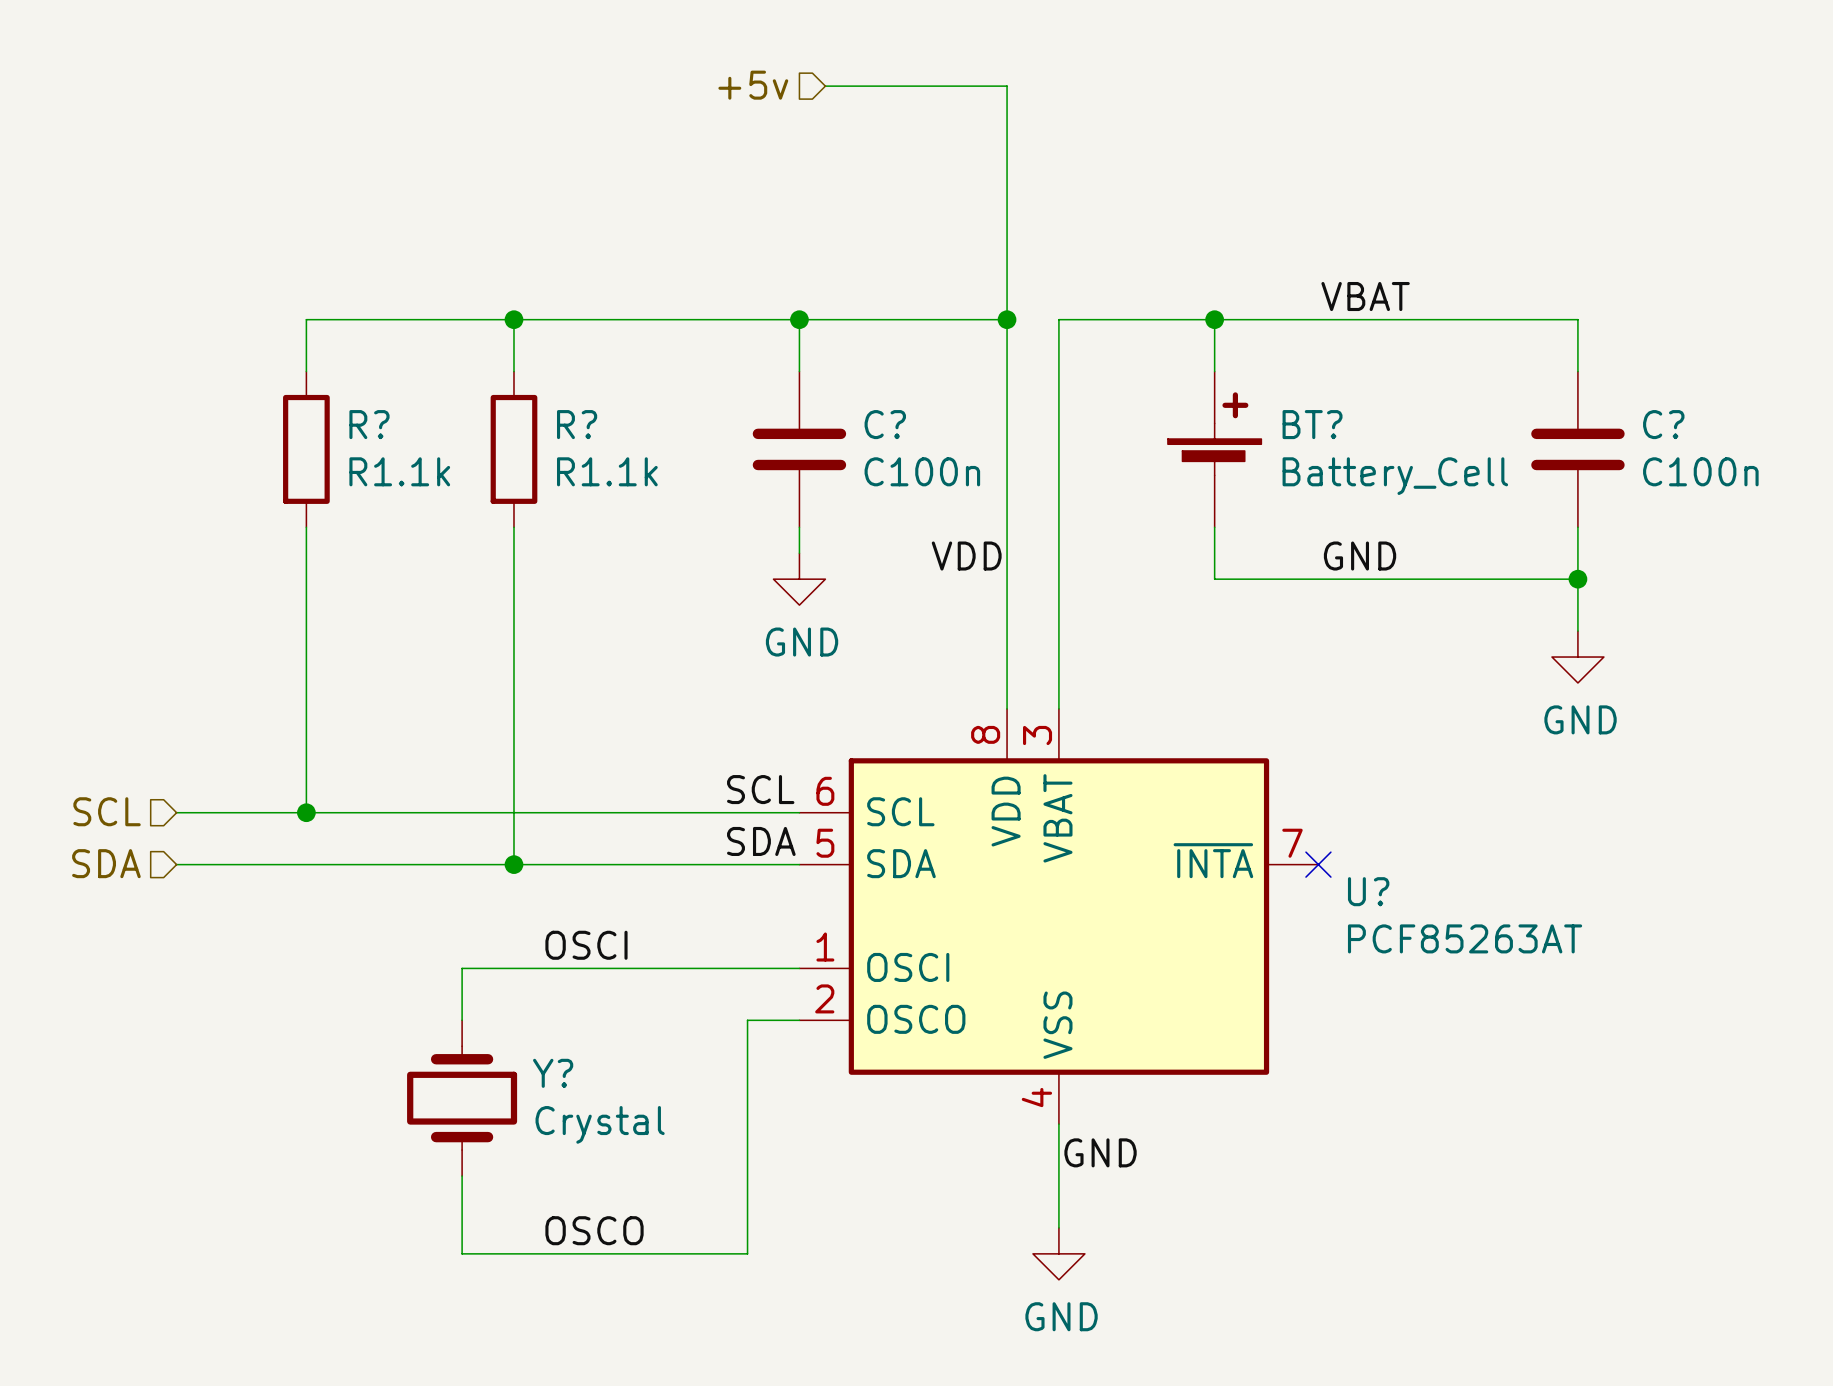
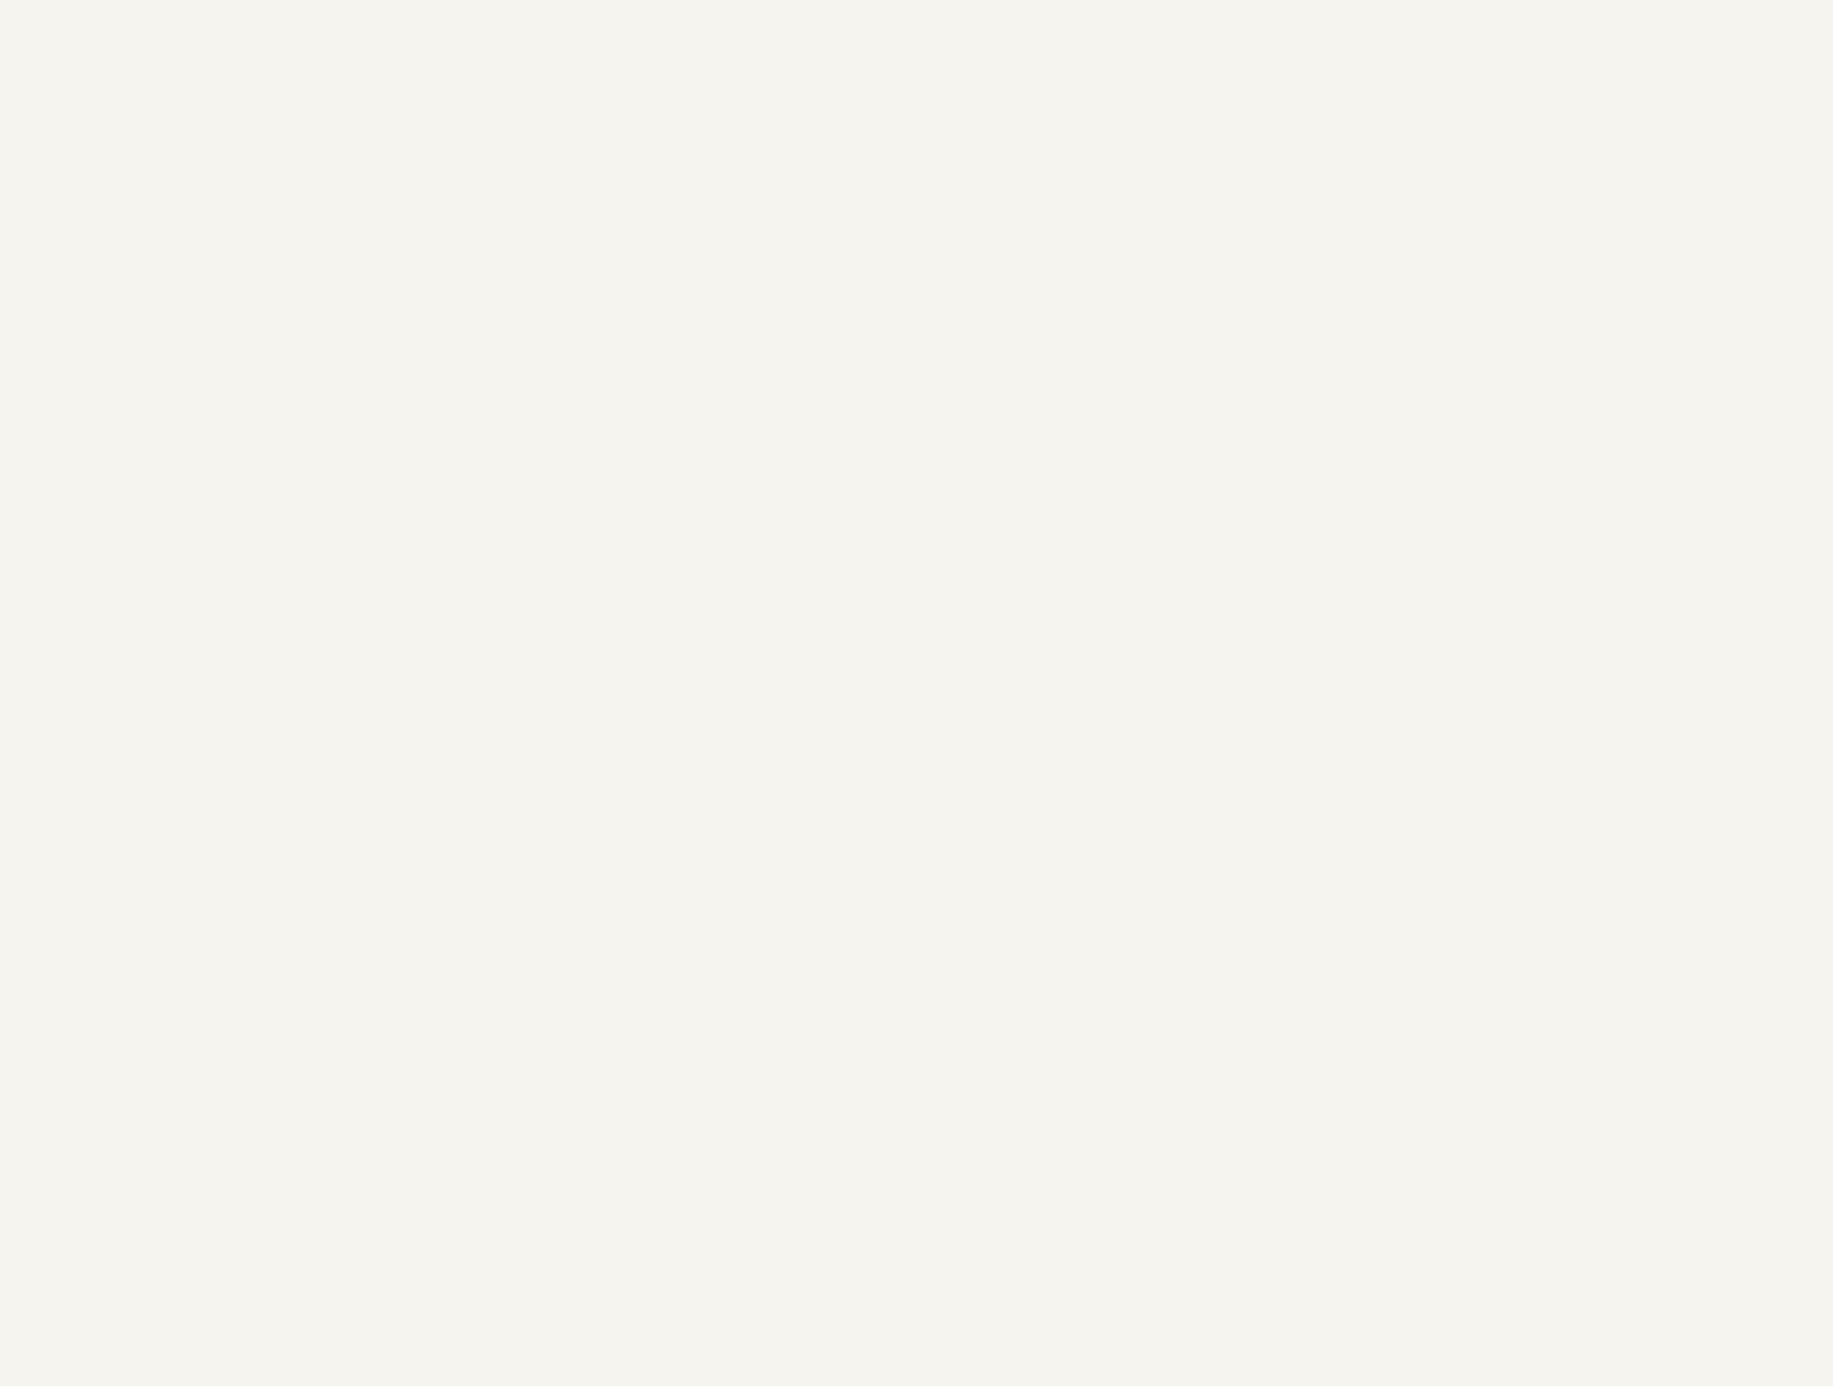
hierarchical label: +5v (753, 85) -> none
wire: (825, 86) (1007, 86) (1007, 708) -> none
label: VBAT (1365, 296) -> none
wire: (513, 319) (513, 371) -> none
junction: (513, 319) -> none
wire: (799, 319) (799, 371) -> none
junction: (799, 319) -> none
wire: (1007, 319) (306, 319) (306, 371) -> none
junction: (1007, 319) -> none
wire: (1214, 319) (1214, 371) -> none
junction: (1214, 319) -> none
wire: (1577, 371) (1577, 319) (1058, 319) (1058, 708) -> none
R?: R1.1k (306, 449) -> none
R?: R1.1k (513, 449) -> none
C?: C100n (799, 449) -> none
BT?: Battery_Cell (1214, 449) -> none
C?: C100n (1577, 449) -> none
wire: (306, 527) (306, 812) -> none
wire: (513, 527) (513, 864) -> none
wire: (799, 527) (799, 553) -> none
wire: (1214, 527) (1214, 579) (1577, 579) -> none
wire: (1577, 527) (1577, 631) -> none
label: VDD (966, 556) -> none
label: GND (1360, 556) -> none
power symbol: GND (799, 579) -> none
junction: (1577, 579) -> none
power symbol: GND (1577, 657) -> none
label: SCL (760, 789) -> none
hierarchical label: SCL (107, 811) -> none
wire: (176, 812) (799, 812) -> none
junction: (306, 812) -> none
label: SDA (761, 841) -> none
hierarchical label: SDA (106, 863) -> none
wire: (176, 864) (799, 864) -> none
junction: (513, 864) -> none
no-connect mark: (1318, 864) -> none
U?: PCF85263AT (1058, 916) -> none
label: OSCI (586, 945) -> none
wire: (799, 968) (462, 968) (462, 1020) -> none
wire: (799, 1020) (747, 1020) (747, 1253) (462, 1253) (462, 1176) -> none
Y?: Crystal (462, 1098) -> none
wire: (1058, 1124) (1058, 1227) -> none
label: GND (1100, 1152) -> none
label: OSCO (594, 1230) -> none
power symbol: GND (1058, 1253) -> none

